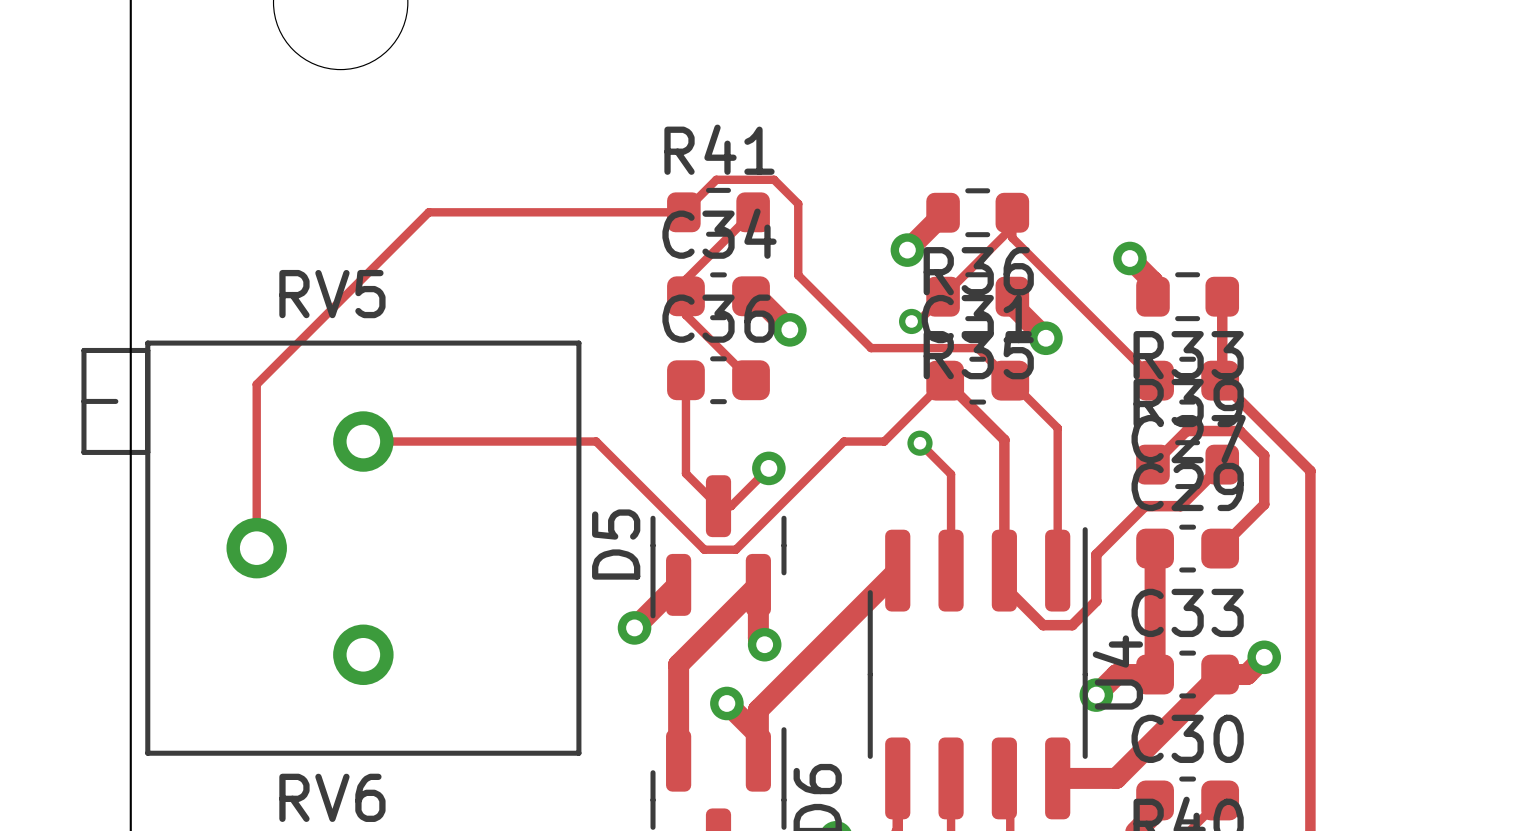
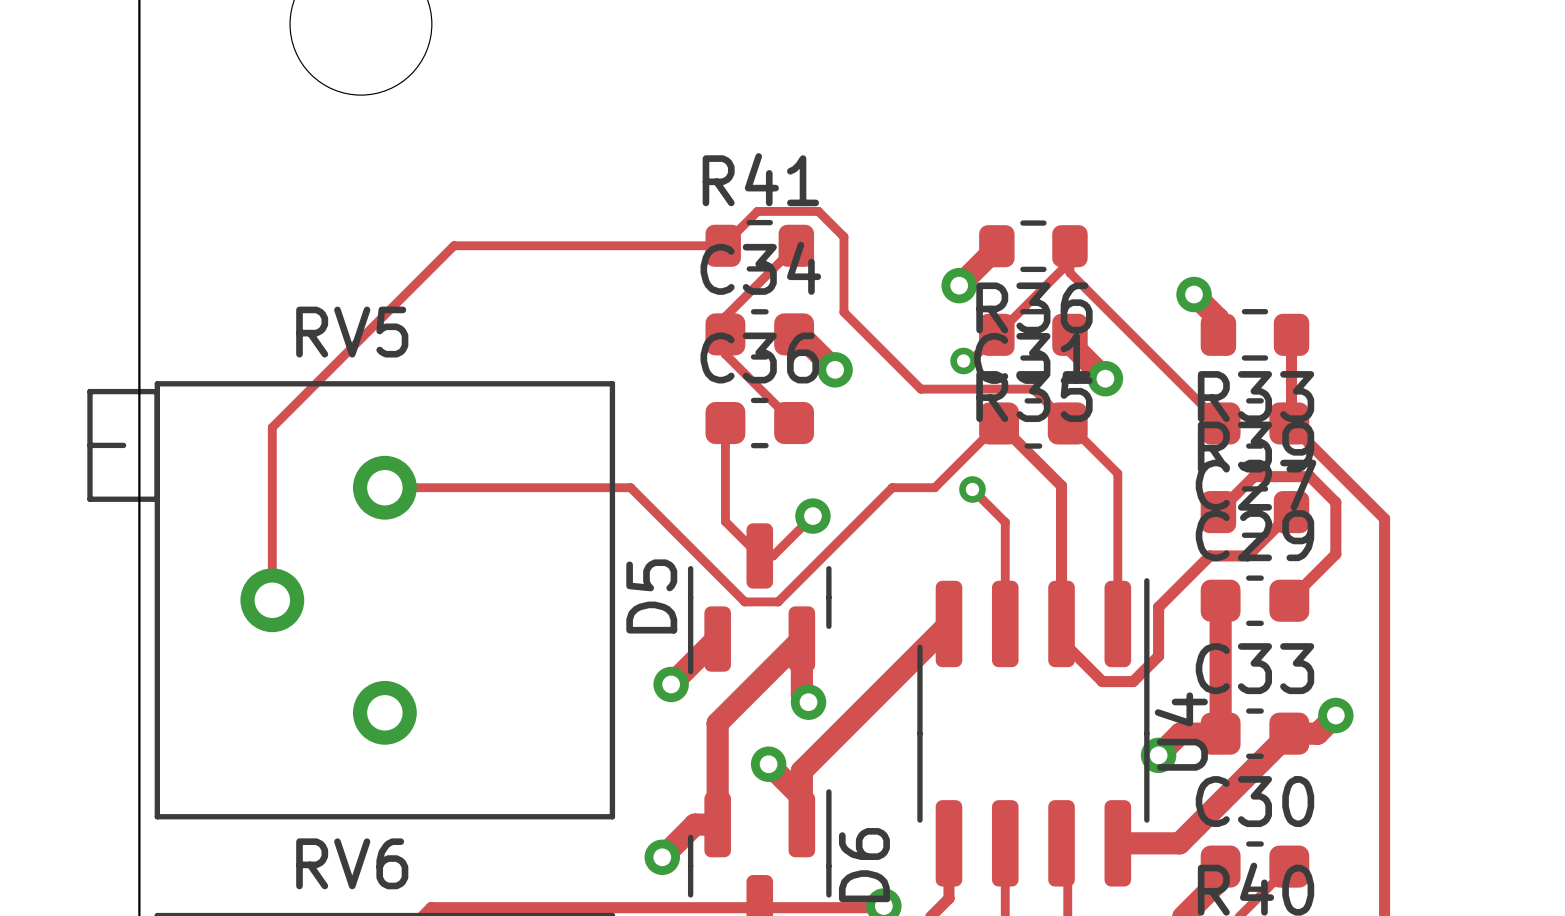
track: none -> (717, 824) (694, 824) (662, 857)
via: none -> (662, 857)

